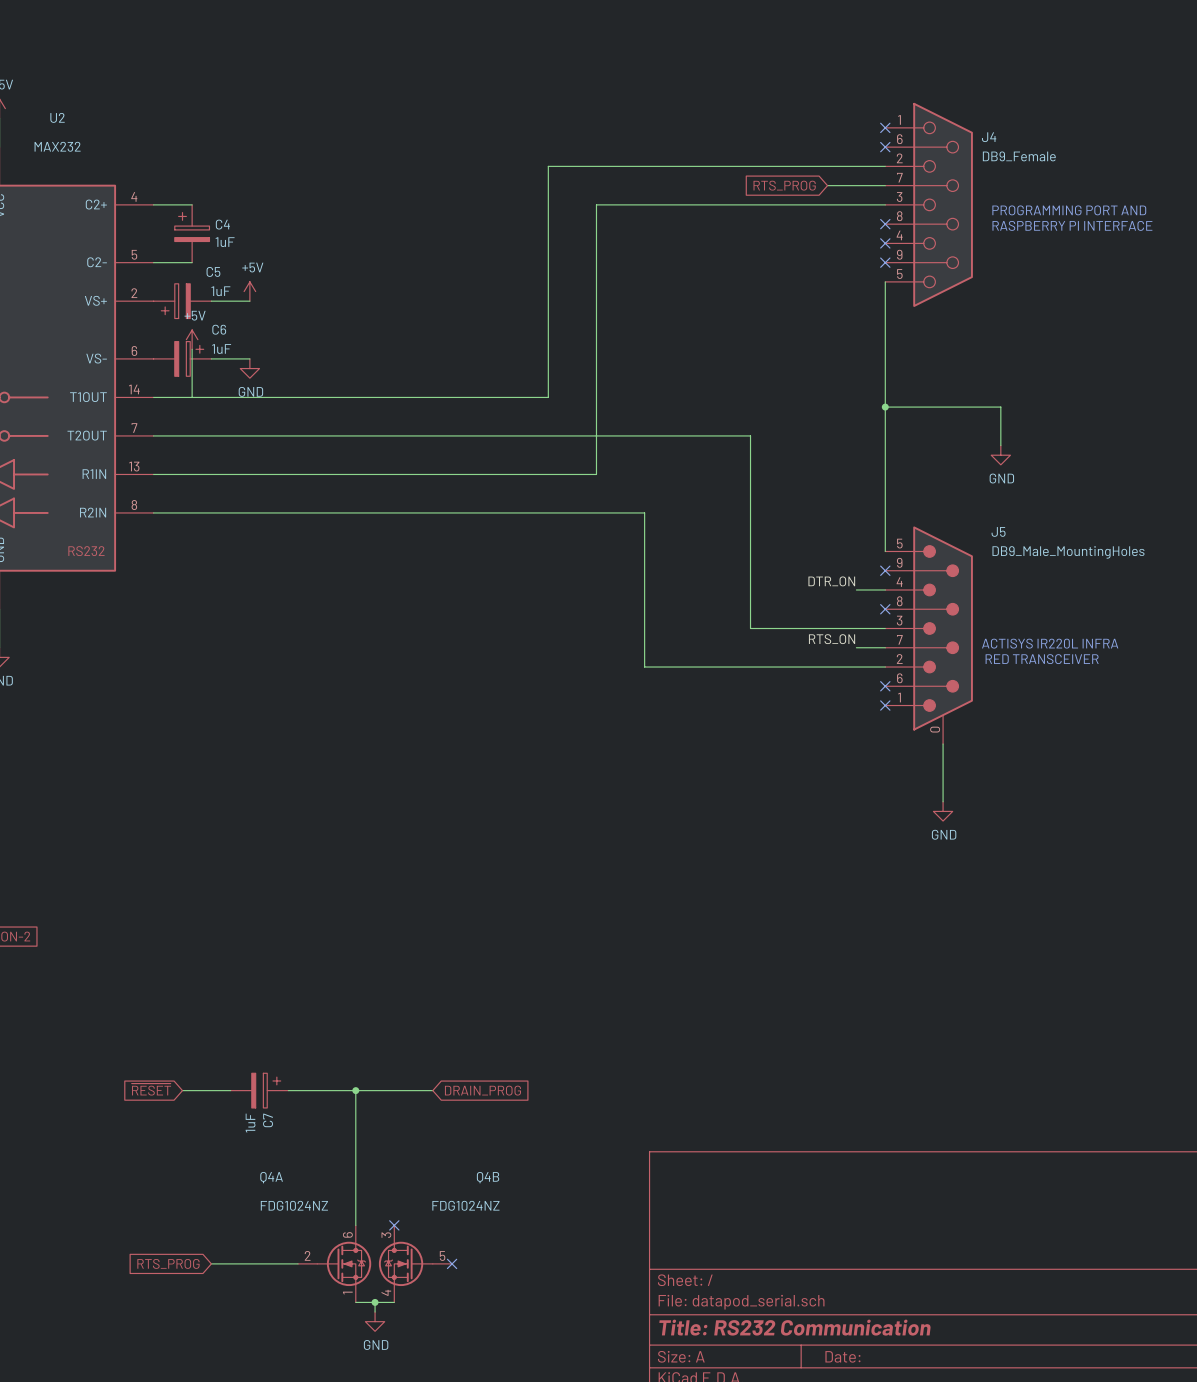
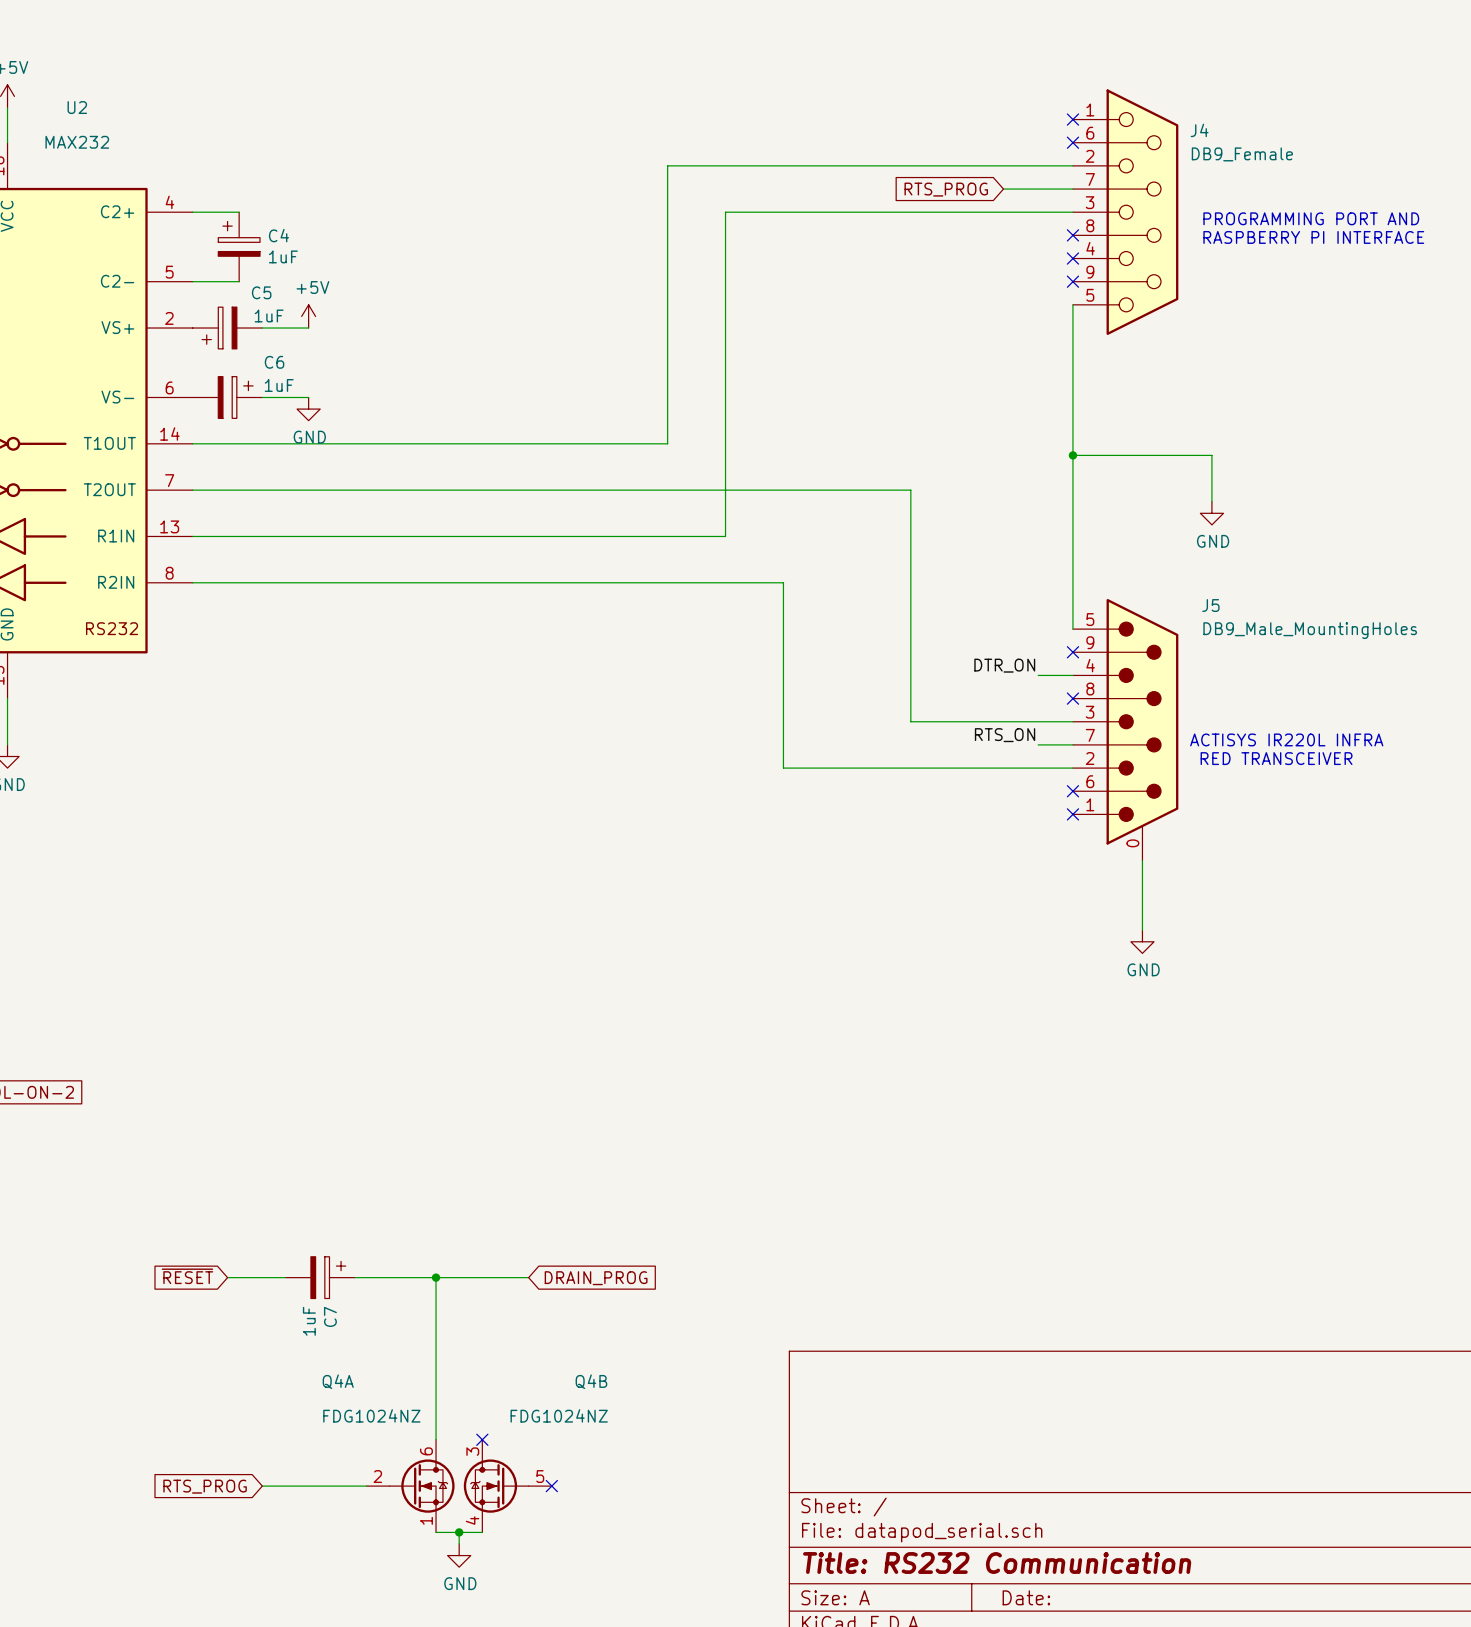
power symbol: +5V (192, 339) -> none
wire: (192, 349) (192, 397) -> none

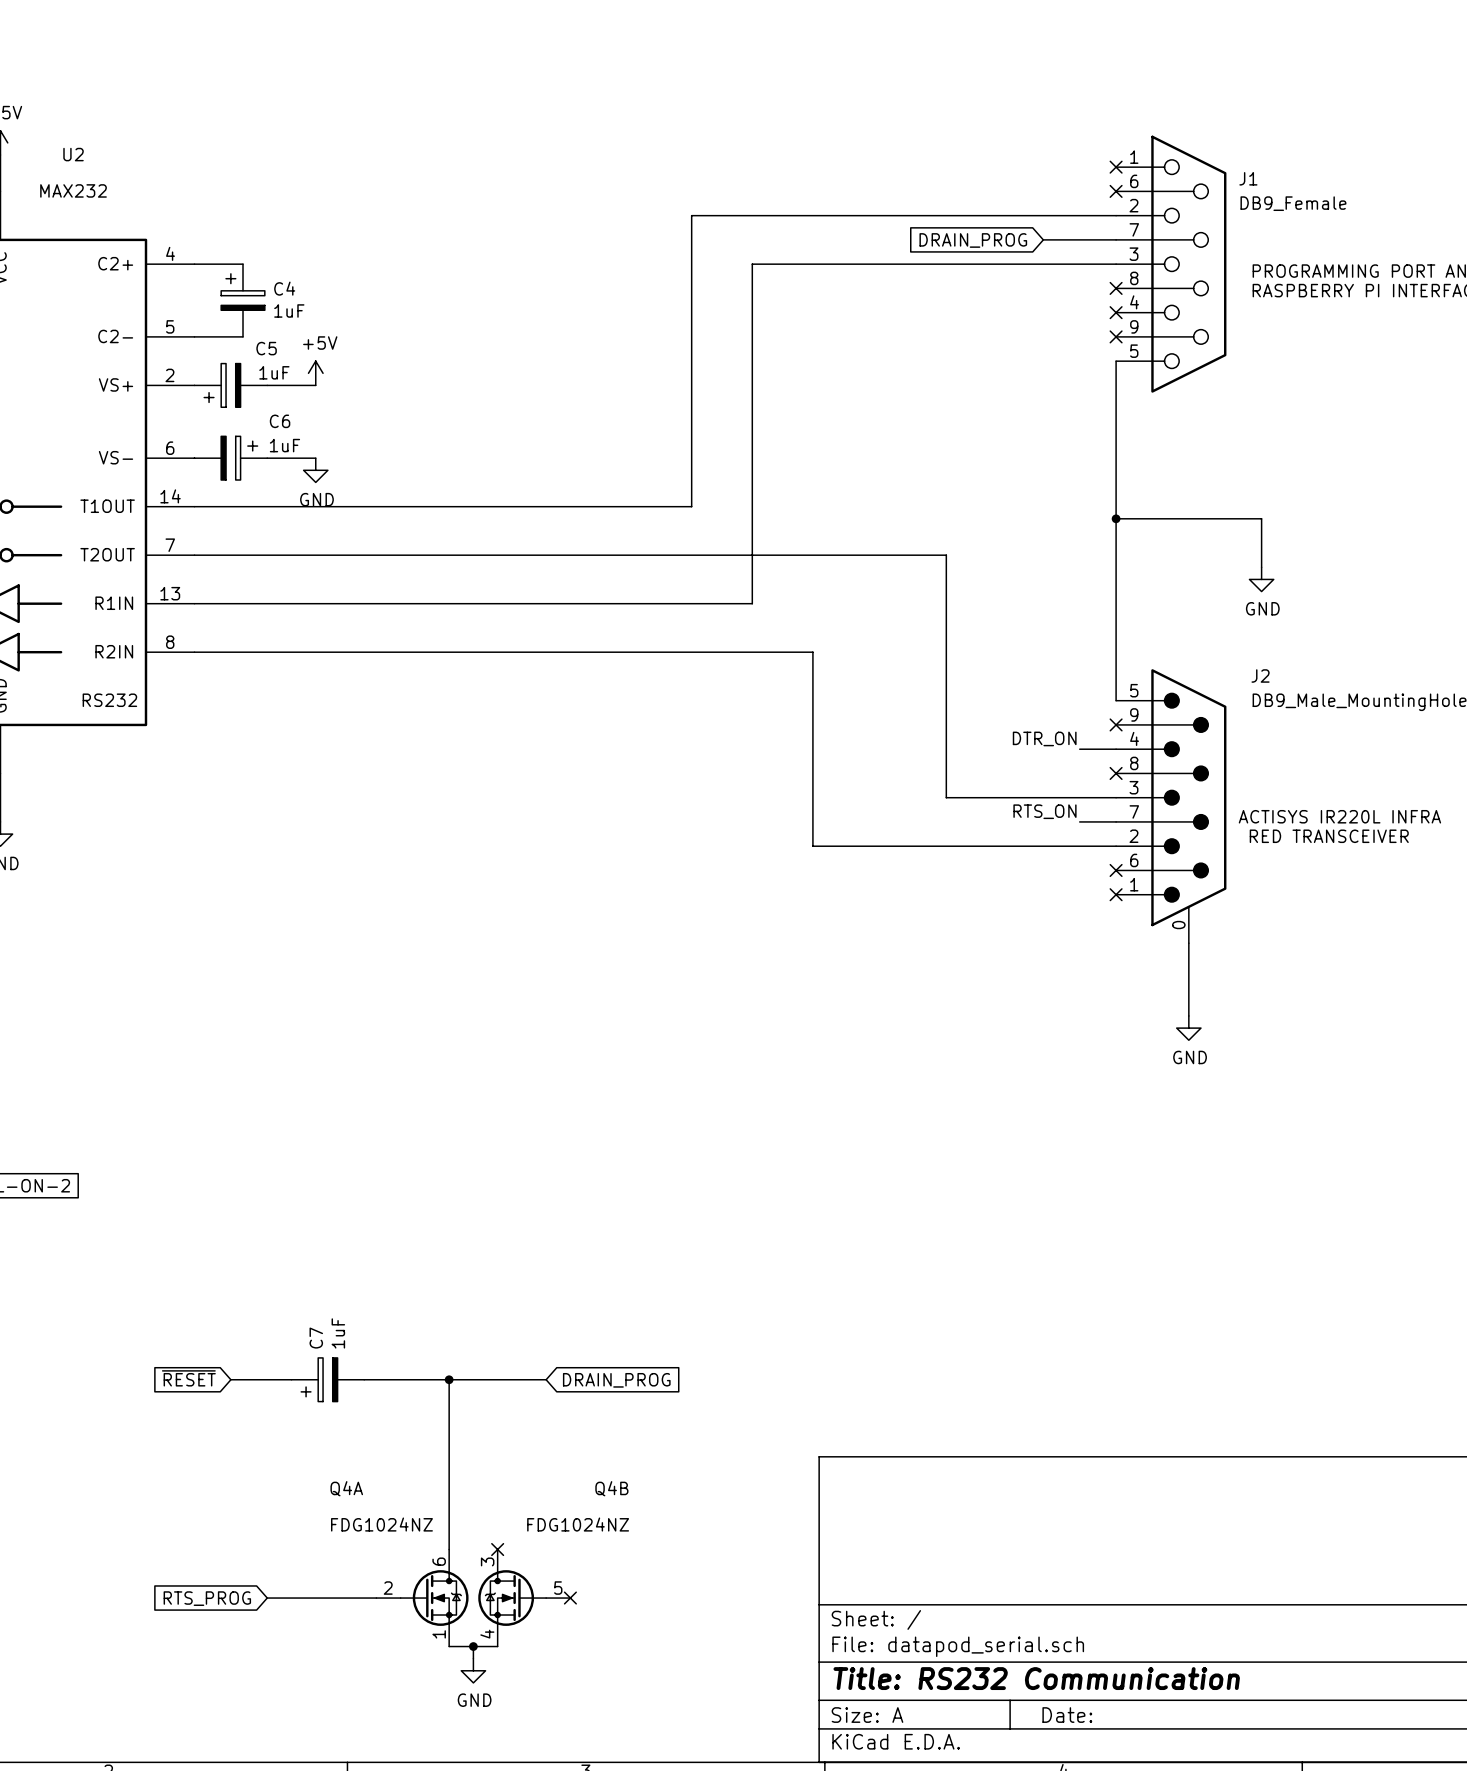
J4 name: J4 (1199, 130) -> J1 (1248, 178)
global label: RTS_PROG (946, 189) -> DRAIN_PROG (973, 240)
J5 name: J5 (1210, 605) -> J2 (1260, 675)
C7 rotation: 0° (328, 1277) -> 180° (319, 1379)

